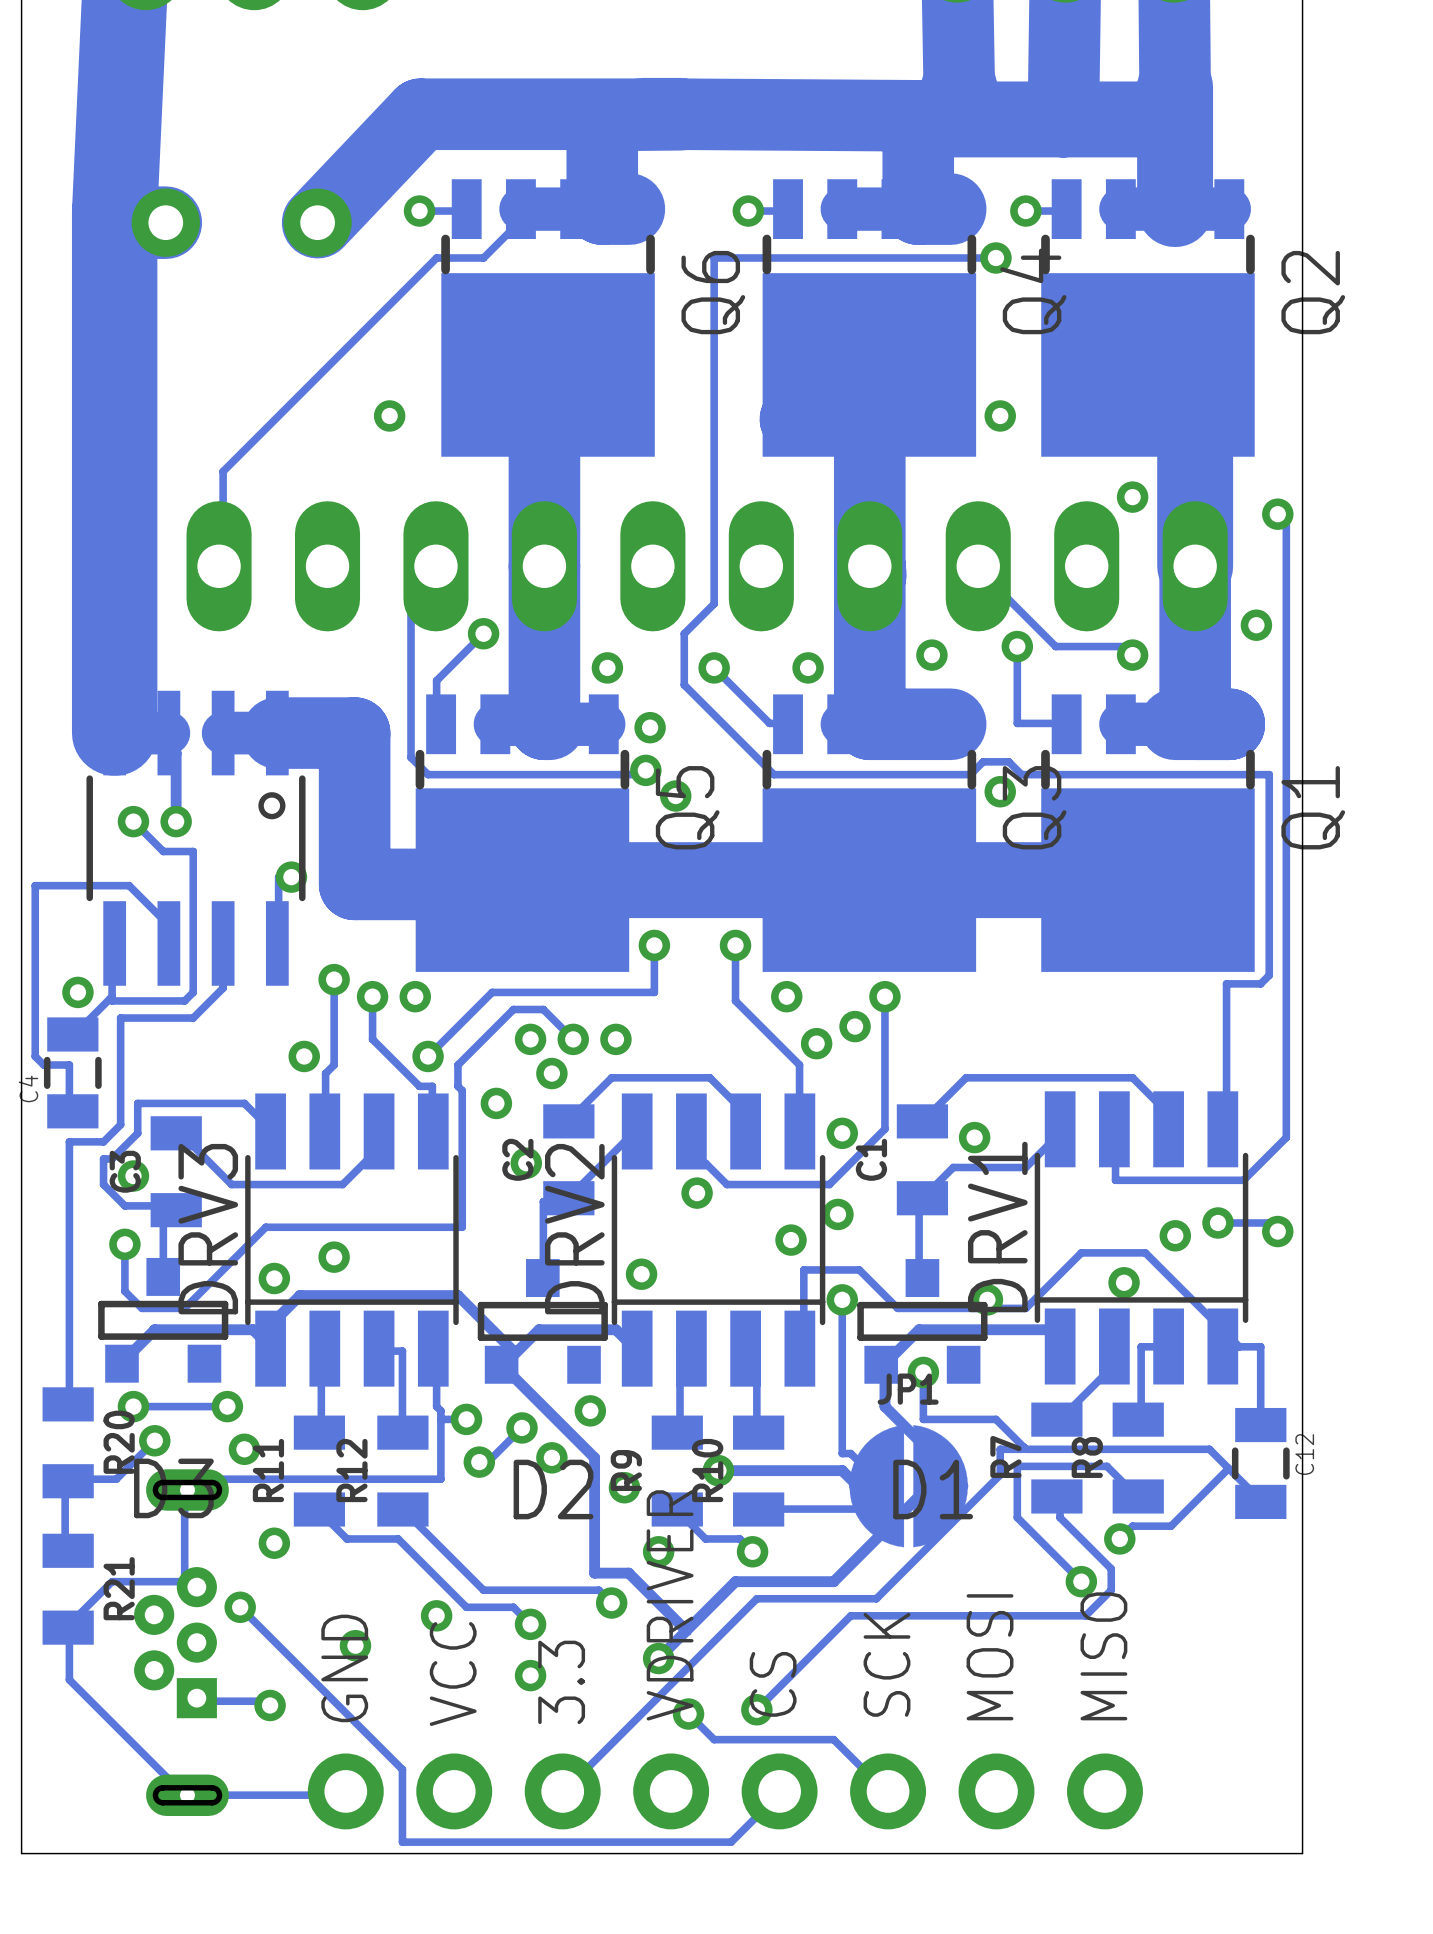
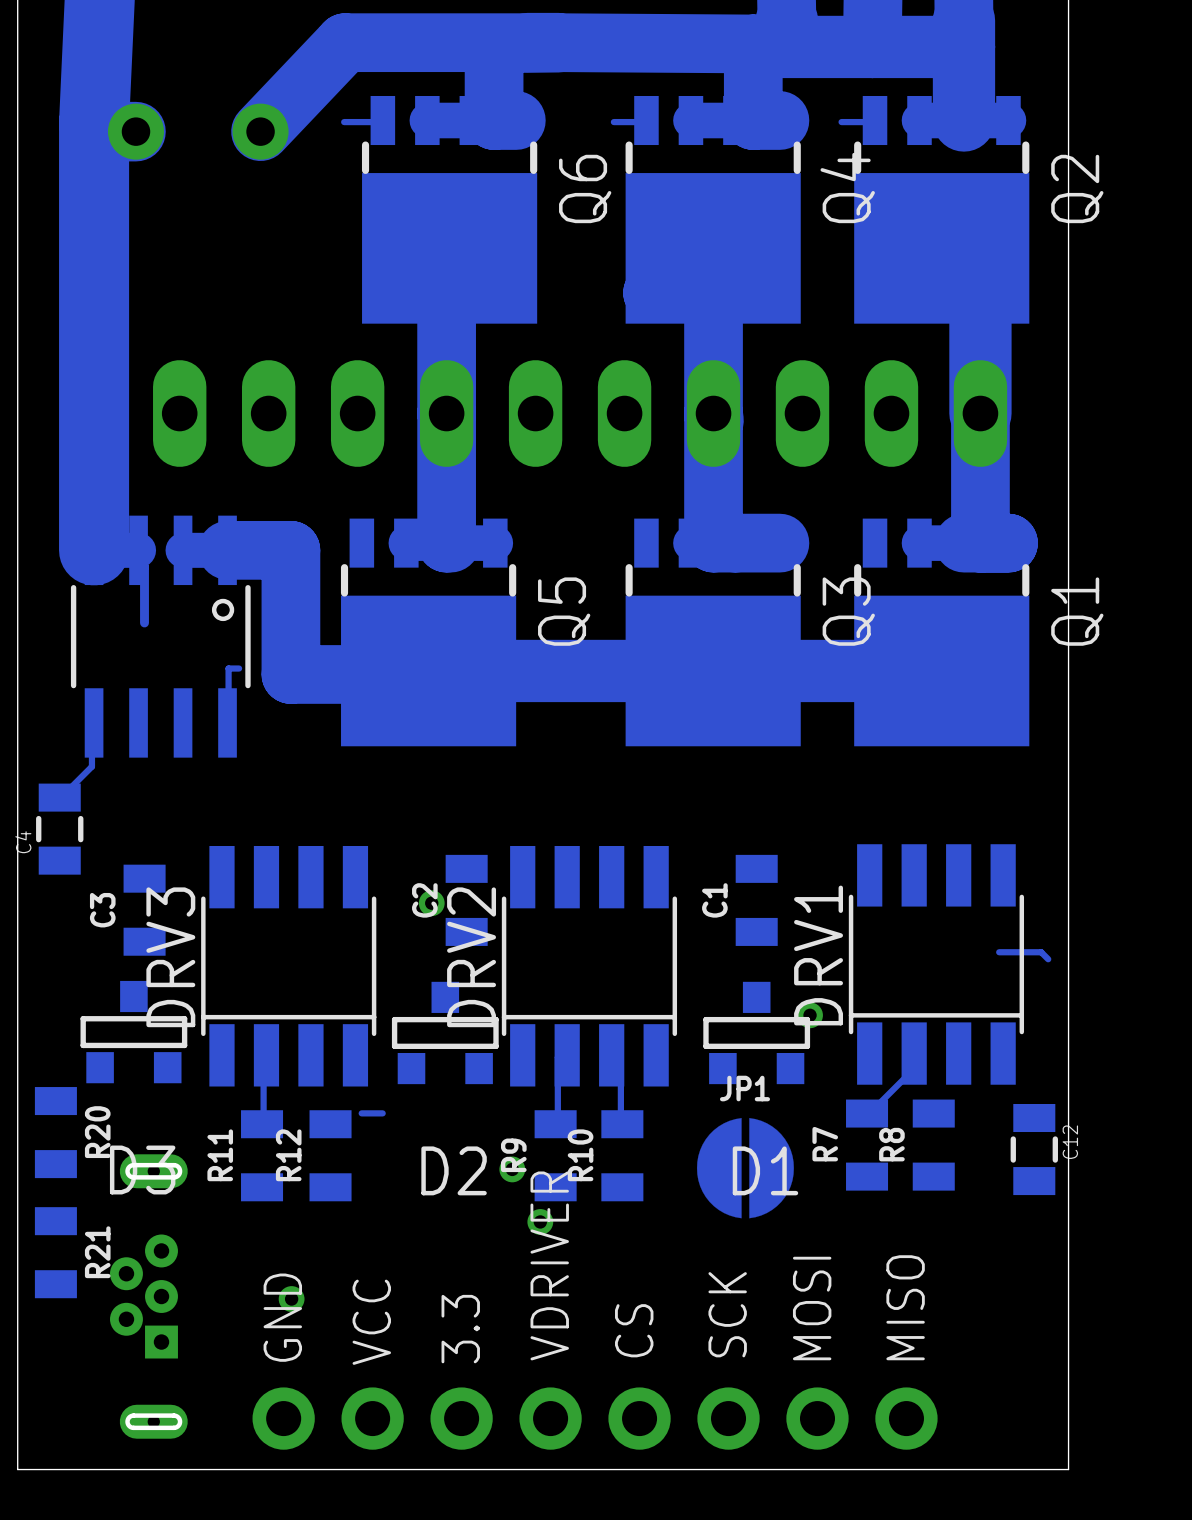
track: (520, 209) (513, 228) (483, 257) (436, 257) (223, 471) (223, 565) (219, 566) -> none
via: (419, 211) -> none
via: (748, 211) -> none
via: (1025, 211) -> none
track: (995, 257) (714, 257) (714, 603) (684, 633) (684, 684) (773, 774) (970, 774) (983, 761) (1008, 761) (1021, 774) (1269, 774) (1269, 975) (1260, 983) (1226, 983) (1226, 1129) (1222, 1129) -> none
via: (995, 257) -> none
via: (389, 415) -> none
via: (1000, 415) -> none
via: (1132, 497) -> none
track: (1277, 514) (1286, 514) (1286, 1137) (1243, 1180) (1115, 1180) (1114, 1129) -> none
via: (1277, 514) -> none
track: (435, 566) (432, 569) (410, 569) (410, 757) (428, 774) (641, 774) (645, 770) -> none
track: (978, 566) (978, 569) (1055, 646) (1124, 646) (1132, 655) -> none
via: (1256, 625) -> none
track: (483, 633) (436, 680) (436, 723) (441, 724) -> none
via: (483, 633) -> none
track: (1017, 646) (1017, 723) (1066, 724) -> none
via: (1017, 646) -> none
via: (931, 655) -> none
via: (1132, 655) -> none
via: (607, 667) -> none
track: (714, 667) (769, 723) (788, 724) -> none
via: (714, 667) -> none
via: (808, 667) -> none
via: (650, 727) -> none
via: (645, 770) -> none
via: (1000, 791) -> none
via: (675, 796) -> none
track: (133, 821) (163, 851) (193, 851) (193, 992) (184, 1000) (112, 1000) (109, 998) -> none
via: (133, 821) -> none
via: (176, 821) -> none
via: (291, 877) -> none
track: (168, 943) (167, 924) (129, 885) (35, 885) (35, 1056) (43, 1065) (69, 1065) (69, 1107) (72, 1111) -> none
track: (223, 943) (223, 988) (193, 1018) (120, 1018) (120, 1124) (103, 1141) (69, 1141) (68, 1404) -> none
track: (654, 945) (654, 992) (492, 992) (428, 1056) -> none
via: (654, 945) -> none
track: (735, 945) (735, 1000) (799, 1065) (799, 1131) -> none
via: (735, 945) -> none
track: (334, 979) (334, 1065) (325, 1073) (324, 1131) -> none
via: (334, 979) -> none
via: (77, 992) -> none
track: (372, 996) (372, 1039) (419, 1086) (432, 1086) (433, 1131) -> none
via: (372, 996) -> none
via: (415, 996) -> none
via: (786, 996) -> none
track: (884, 996) (884, 1129) (829, 1184) (726, 1184) (705, 1163) (692, 1163) (691, 1131) -> none
via: (884, 996) -> none
via: (855, 1026) -> none
via: (530, 1039) -> none
track: (573, 1039) (543, 1009) (513, 1009) (457, 1065) (457, 1086) (462, 1090) (462, 1227) (265, 1227) (184, 1308) (141, 1308) (124, 1291) (124, 1244) -> none
via: (573, 1039) -> none
via: (615, 1039) -> none
via: (816, 1043) -> none
via: (304, 1056) -> none
via: (428, 1056) -> none
via: (551, 1073) -> none
via: (496, 1103) -> none
track: (568, 1121) (611, 1077) (709, 1077) (744, 1111) (745, 1131) -> none
track: (922, 1121) (966, 1077) (1132, 1077) (1166, 1111) (1166, 1129) (1168, 1129) -> none
track: (1060, 1129) (1060, 1133) (1025, 1167) (953, 1167) (919, 1201) (919, 1274) (922, 1278) -> none
track: (270, 1131) (244, 1103) (137, 1103) (137, 1133) (112, 1158) (103, 1158) (103, 1184) (124, 1205) (159, 1205) (163, 1210) -> none
track: (379, 1131) (376, 1133) (376, 1150) (342, 1184) (231, 1184) (180, 1133) (176, 1133) -> none
track: (637, 1131) (633, 1133) (564, 1201) (543, 1201) (542, 1278) -> none
via: (842, 1133) -> none
via: (974, 1137) -> none
via: (133, 1176) -> none
via: (697, 1193) -> none
track: (163, 1210) (163, 1276) -> none
via: (837, 1214) -> none
via: (1218, 1222) -> none
via: (1277, 1231) -> none
via: (1175, 1235) -> none
via: (791, 1240) -> none
via: (124, 1244) -> none
via: (334, 1257) -> none
via: (641, 1274) -> none
via: (274, 1278) -> none
via: (1124, 1282) -> none
track: (842, 1299) (842, 1453) (850, 1453) (876, 1479) (876, 1509) (758, 1509) -> none
via: (842, 1299) -> none
track: (1060, 1346) (1060, 1342) (1047, 1329) (919, 1329) (884, 1363) (881, 1364) (884, 1368) (884, 1406) (962, 1486) -> none
track: (1168, 1346) (1141, 1346) (1141, 1419) (1138, 1419) -> none
track: (1222, 1346) (1260, 1346) (1260, 1425) -> none
track: (1239, 1346) (1145, 1252) (1081, 1252) (1025, 1308) (897, 1308) (859, 1269) (803, 1269) (803, 1346) (799, 1348) -> none
track: (379, 1348) (381, 1351) (402, 1351) (402, 1432) -> none
track: (433, 1348) (436, 1351) (436, 1406) (440, 1410) (440, 1479) (197, 1479) (184, 1491) (184, 1581) (196, 1587) (188, 1581) (112, 1581) (68, 1627) (69, 1679) (184, 1795) (342, 1795) (345, 1791) -> none
track: (637, 1348) (615, 1329) (539, 1329) (504, 1363) (501, 1364) -> none
track: (122, 1363) (154, 1329) (253, 1329) (270, 1348) (261, 1334) (299, 1295) (457, 1295) (513, 1351) (501, 1364) -> none
track: (501, 1364) (594, 1457) (594, 1573) (628, 1573) (686, 1630) -> none
track: (923, 1372) (923, 1419) (995, 1419) (1025, 1449) (1209, 1449) (1260, 1501) -> none
via: (923, 1372) -> none
via: (133, 1406) -> none
track: (227, 1406) (133, 1406) -> none
via: (227, 1406) -> none
via: (590, 1410) -> none
via: (466, 1419) -> none
track: (522, 1427) (487, 1462) (479, 1462) -> none
via: (522, 1427) -> none
track: (154, 1440) (116, 1479) (69, 1479) (65, 1483) (65, 1547) (68, 1550) -> none
via: (154, 1440) -> none
track: (1023, 1447) (1021, 1449) (1000, 1449) (1000, 1474) (876, 1598) (756, 1598) (562, 1791) -> none
via: (244, 1449) -> none
via: (551, 1457) -> none
via: (479, 1462) -> none
track: (946, 1468) (833, 1581) (735, 1581) (658, 1658) -> none
track: (1228, 1468) (1171, 1526) (1132, 1526) (1119, 1538) -> none
track: (718, 1470) (842, 1470) (855, 1483) (854, 1486) -> none
via: (718, 1470) -> none
track: (1056, 1496) (1060, 1500) (1060, 1517) (1111, 1568) (1111, 1590) (1085, 1615) (850, 1615) (756, 1709) -> none
track: (1138, 1496) (1106, 1466) (1017, 1466) (1017, 1517) (1081, 1581) -> none
track: (319, 1509) (346, 1538) (398, 1538) (466, 1607) (513, 1607) (530, 1624) -> none
track: (402, 1509) (483, 1590) (598, 1590) (611, 1603) -> none
track: (677, 1509) (705, 1538) (739, 1538) (752, 1551) -> none
via: (1119, 1538) -> none
via: (274, 1543) -> none
via: (752, 1551) -> none
via: (1081, 1581) -> none
via: (611, 1603) -> none
track: (240, 1607) (402, 1769) (402, 1842) (731, 1842) (778, 1795) (779, 1791) -> none
via: (240, 1607) -> none
via: (436, 1615) -> none
via: (530, 1624) -> none
via: (658, 1658) -> none
via: (530, 1675) -> none
track: (196, 1698) (197, 1701) (265, 1701) (270, 1705) -> none
via: (270, 1705) -> none
via: (756, 1709) -> none
track: (688, 1714) (714, 1739) (833, 1739) (884, 1790) (888, 1791) -> none
via: (688, 1714) -> none

